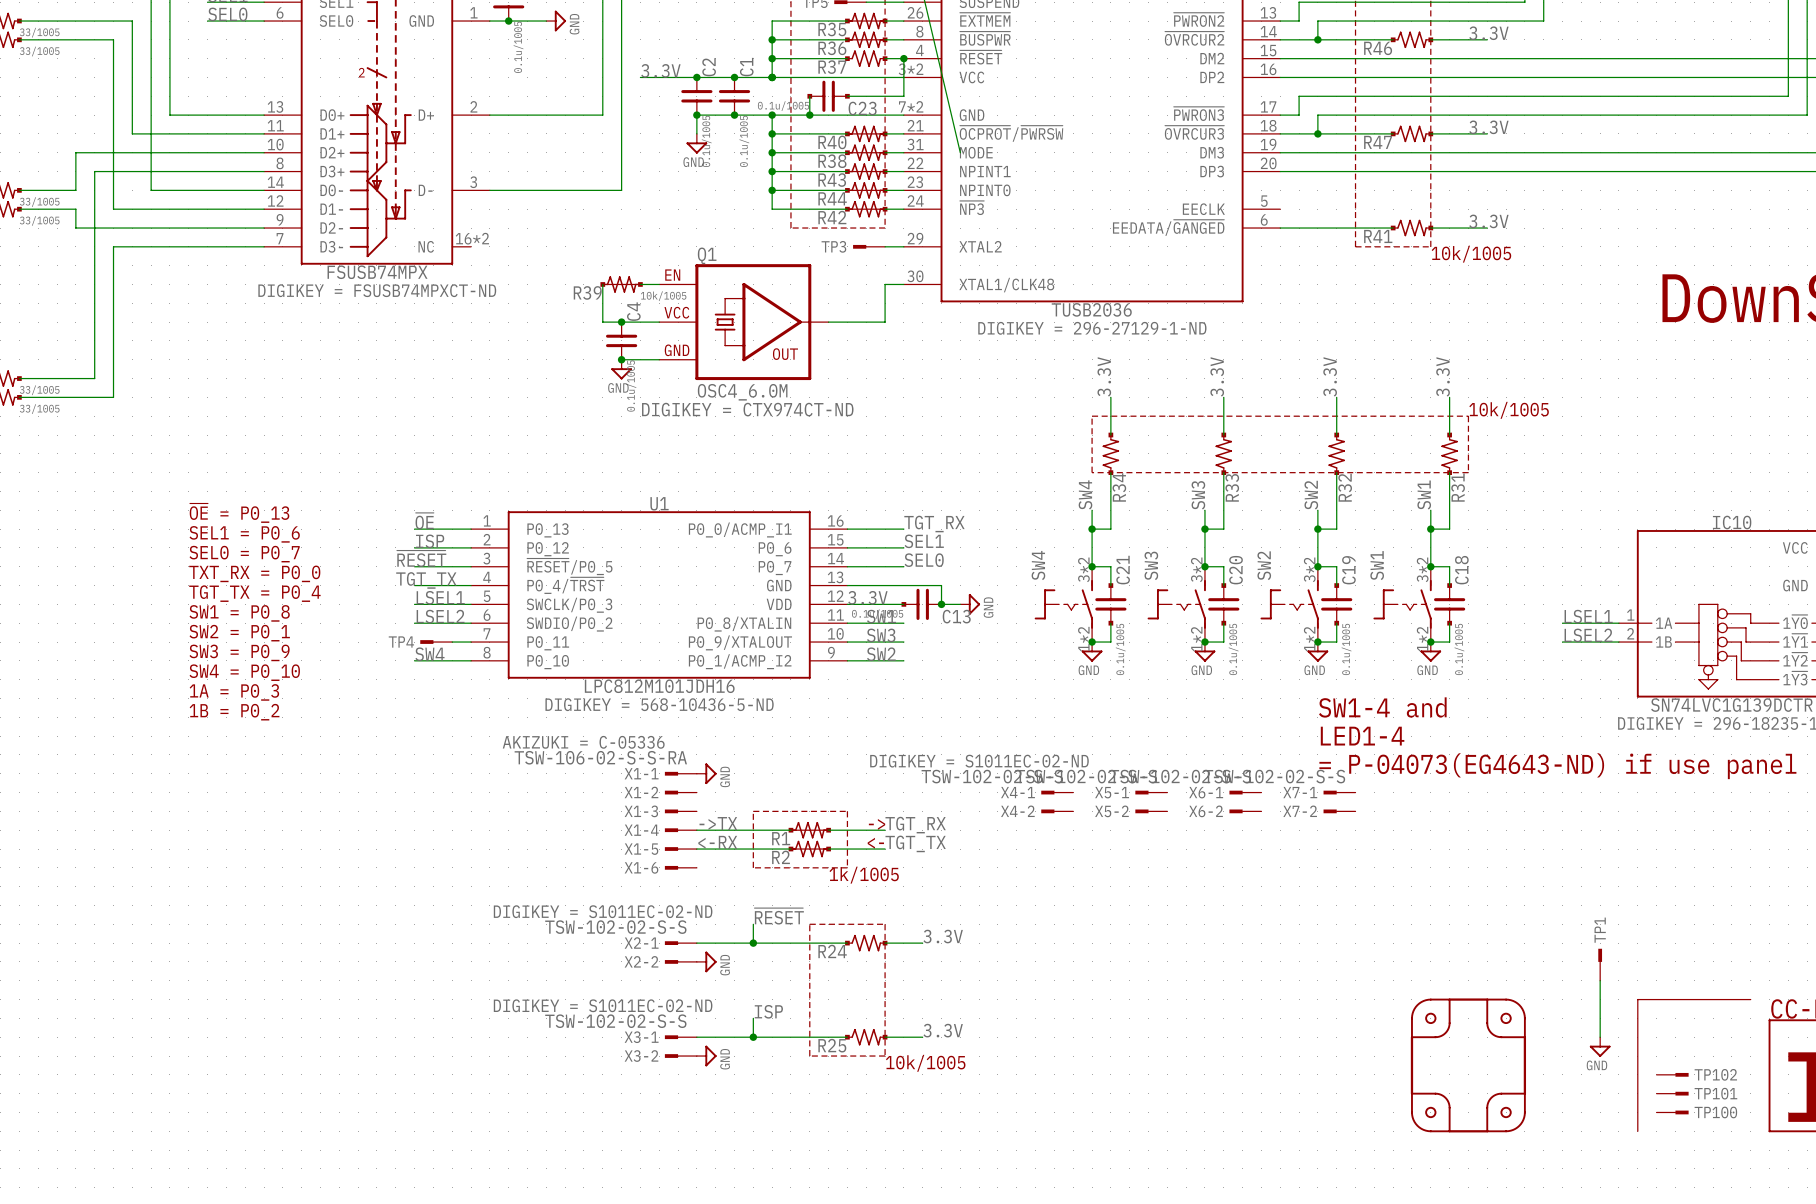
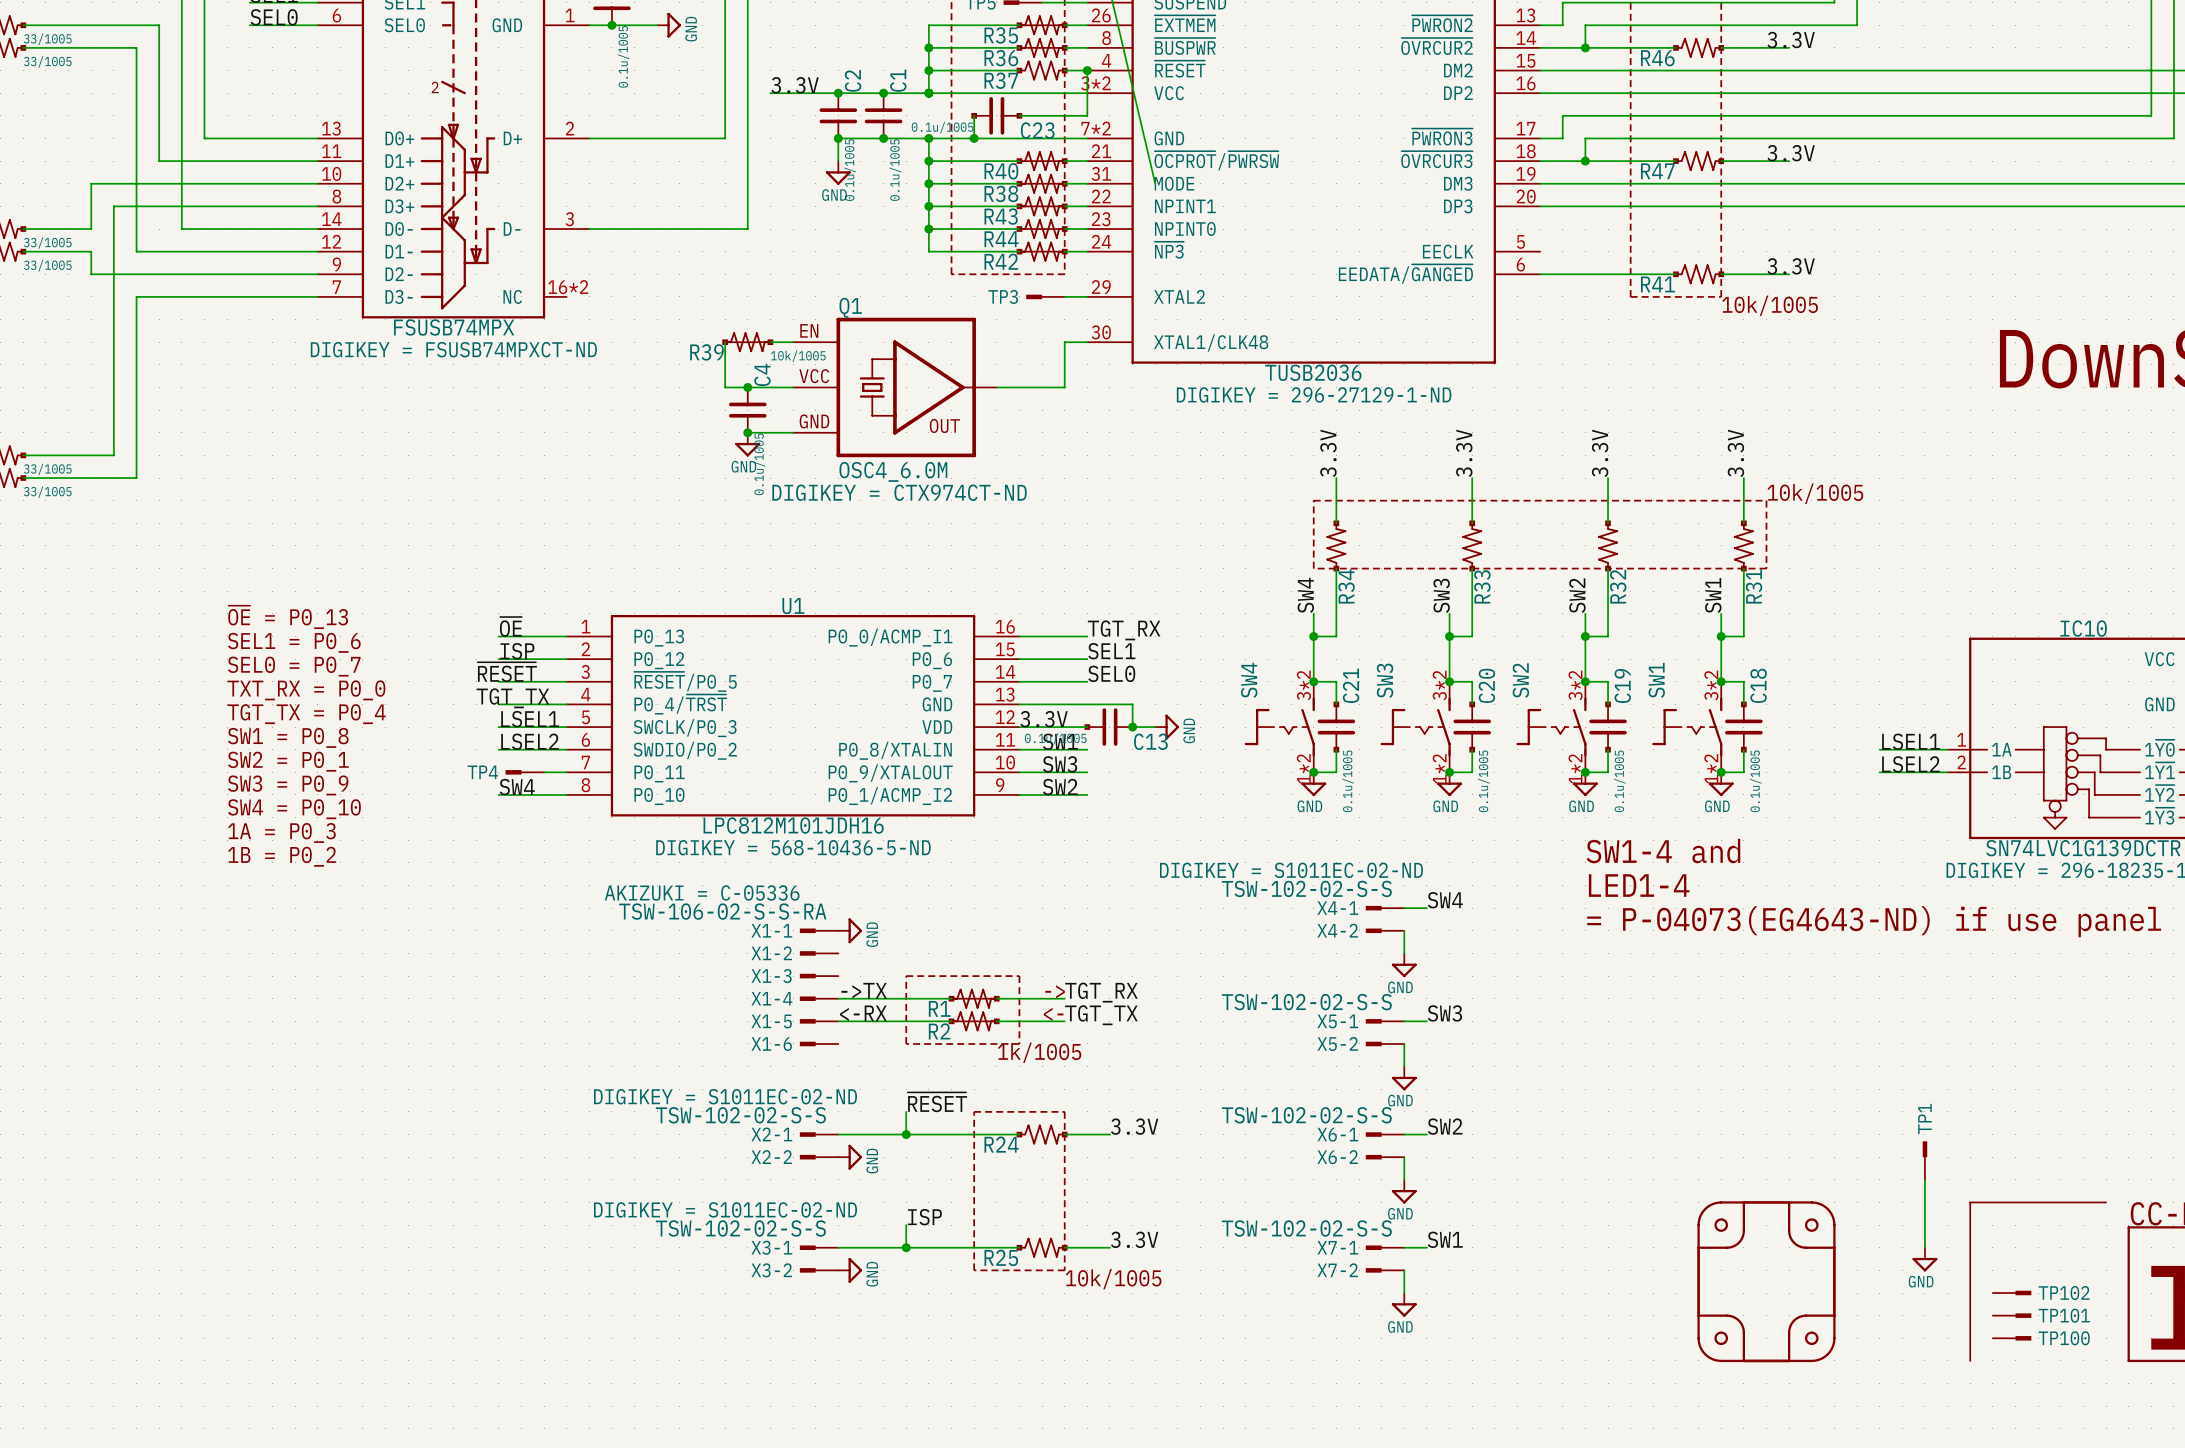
label: none -> SW4 (1445, 900)
wire: none -> (1404, 908) (1426, 908)
wire: none -> (1404, 930) (1404, 953)
X4-1 position: (1057, 792) -> (1385, 908)
X5-1 position: (1151, 792) -> (1385, 1021)
X6-1 position: (1245, 792) -> (1385, 1134)
X7-1 position: (1339, 792) -> (1385, 1247)
power symbol: none -> GND (1404, 964)
X4-2 position: (1057, 811) -> (1385, 930)
X5-2 position: (1151, 811) -> (1385, 1043)
X6-2 position: (1245, 811) -> (1385, 1157)
X7-2 position: (1339, 811) -> (1385, 1270)
label: none -> SW3 (1444, 1013)
wire: none -> (1404, 1021) (1426, 1021)
wire: none -> (1404, 1043) (1404, 1066)
power symbol: none -> GND (1404, 1078)
label: none -> SW2 (1445, 1126)
wire: none -> (1404, 1134) (1426, 1134)
wire: none -> (1404, 1157) (1404, 1179)
power symbol: none -> GND (1404, 1191)
label: none -> SW1 (1445, 1239)
wire: none -> (1404, 1247) (1426, 1247)
wire: none -> (1404, 1270) (1404, 1293)
power symbol: none -> GND (1404, 1304)

